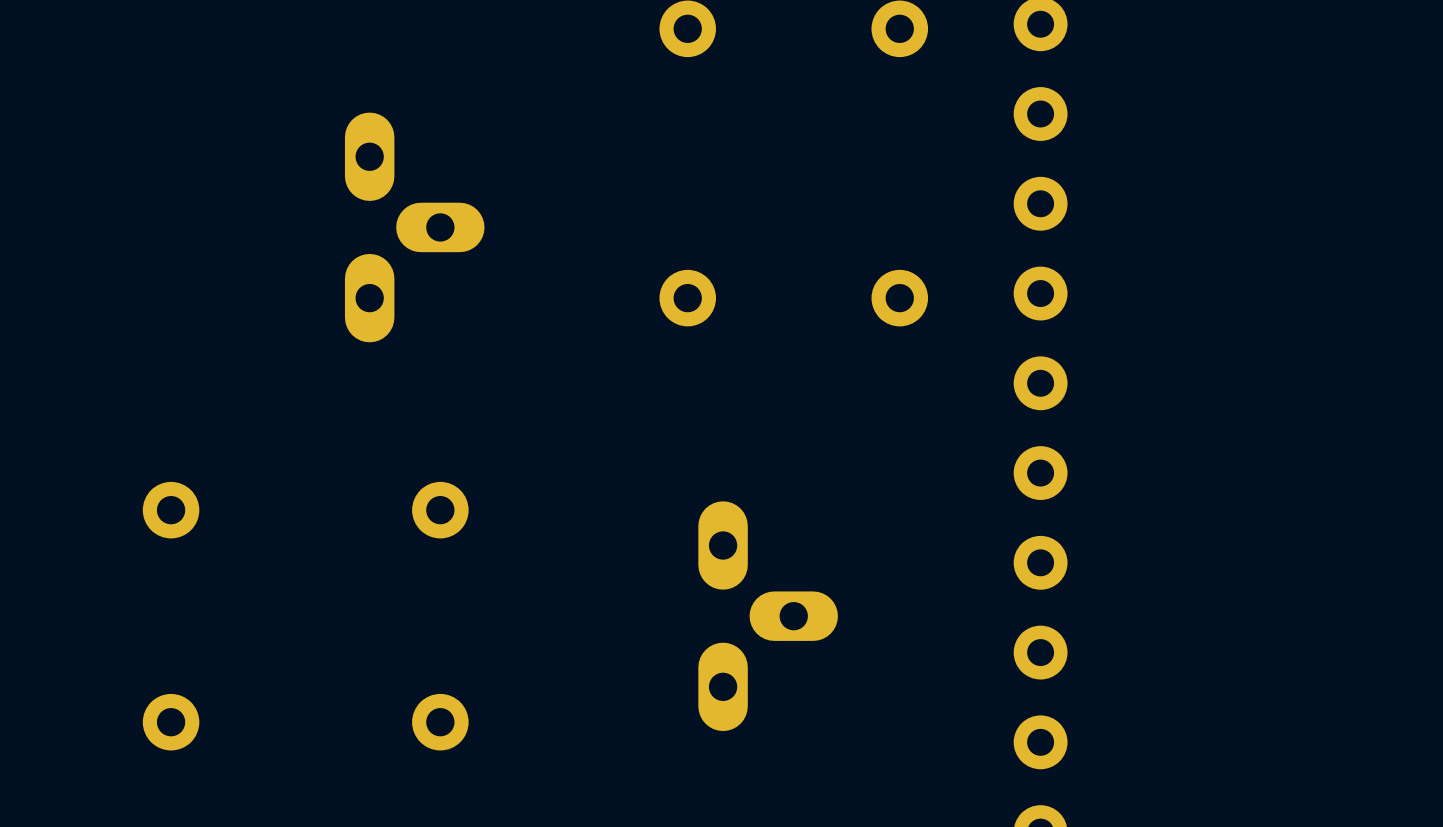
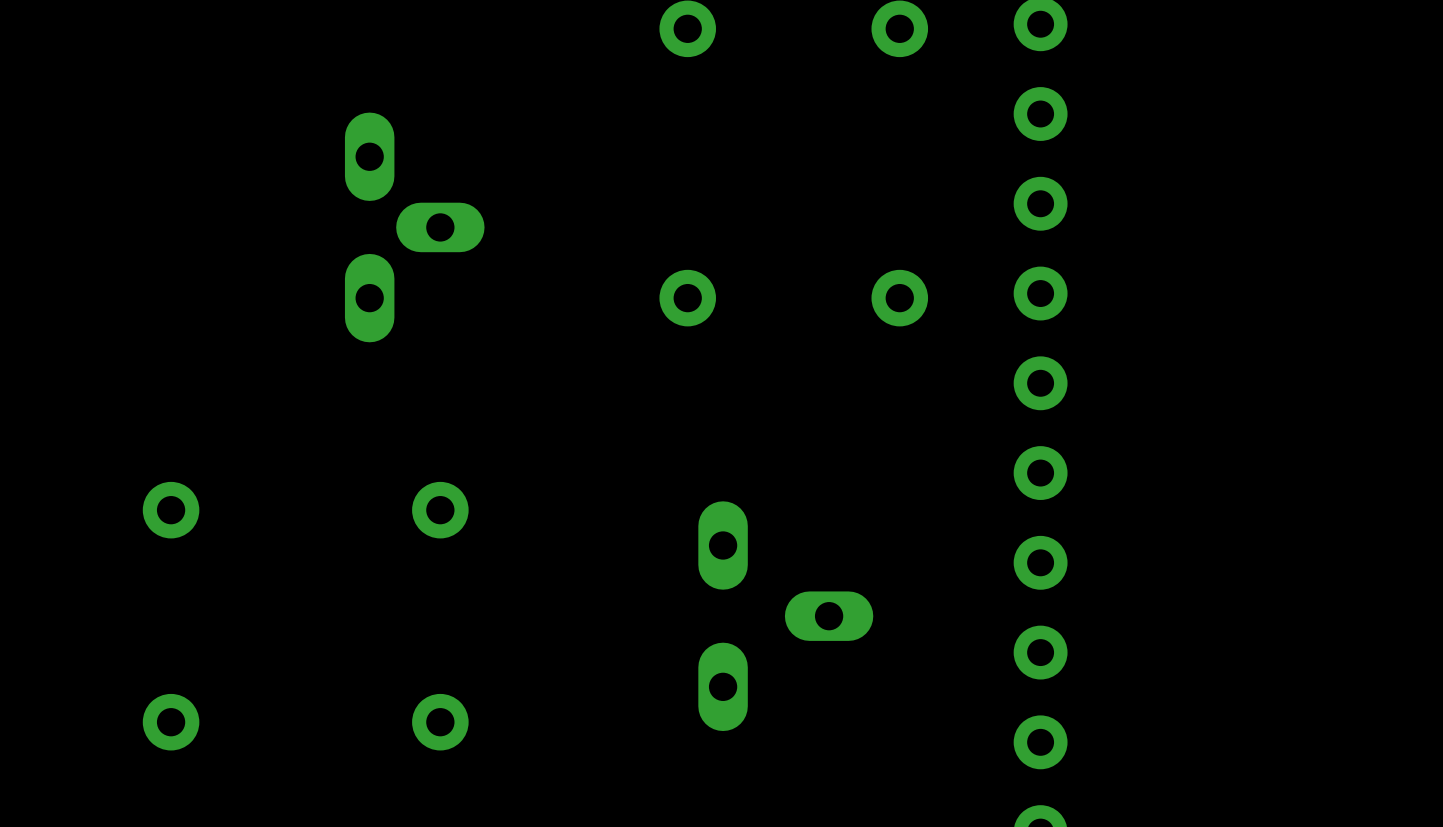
part footprint: [698, 501, 838, 732] -> [698, 501, 874, 732]

